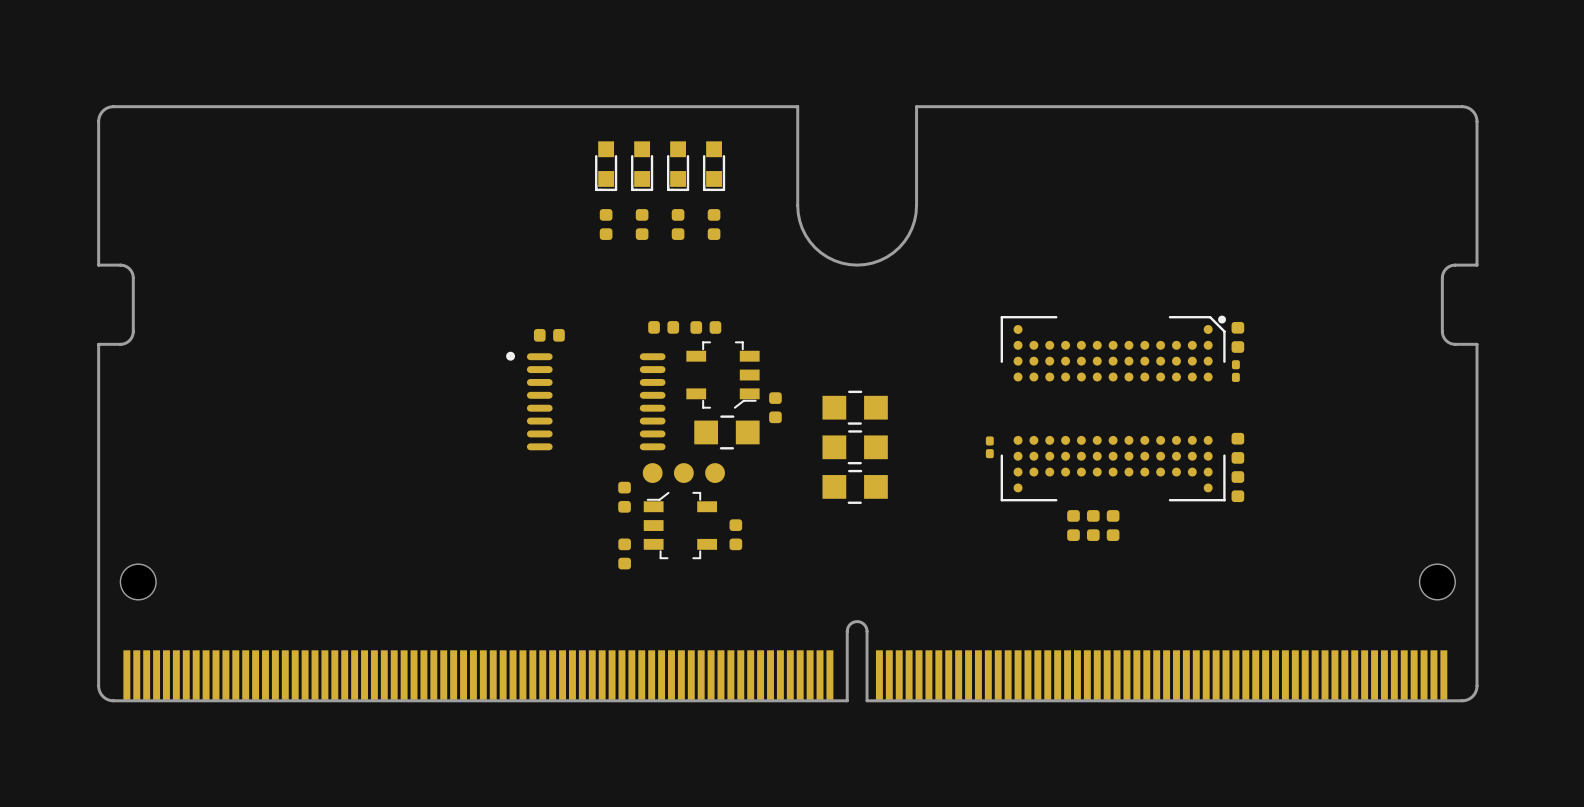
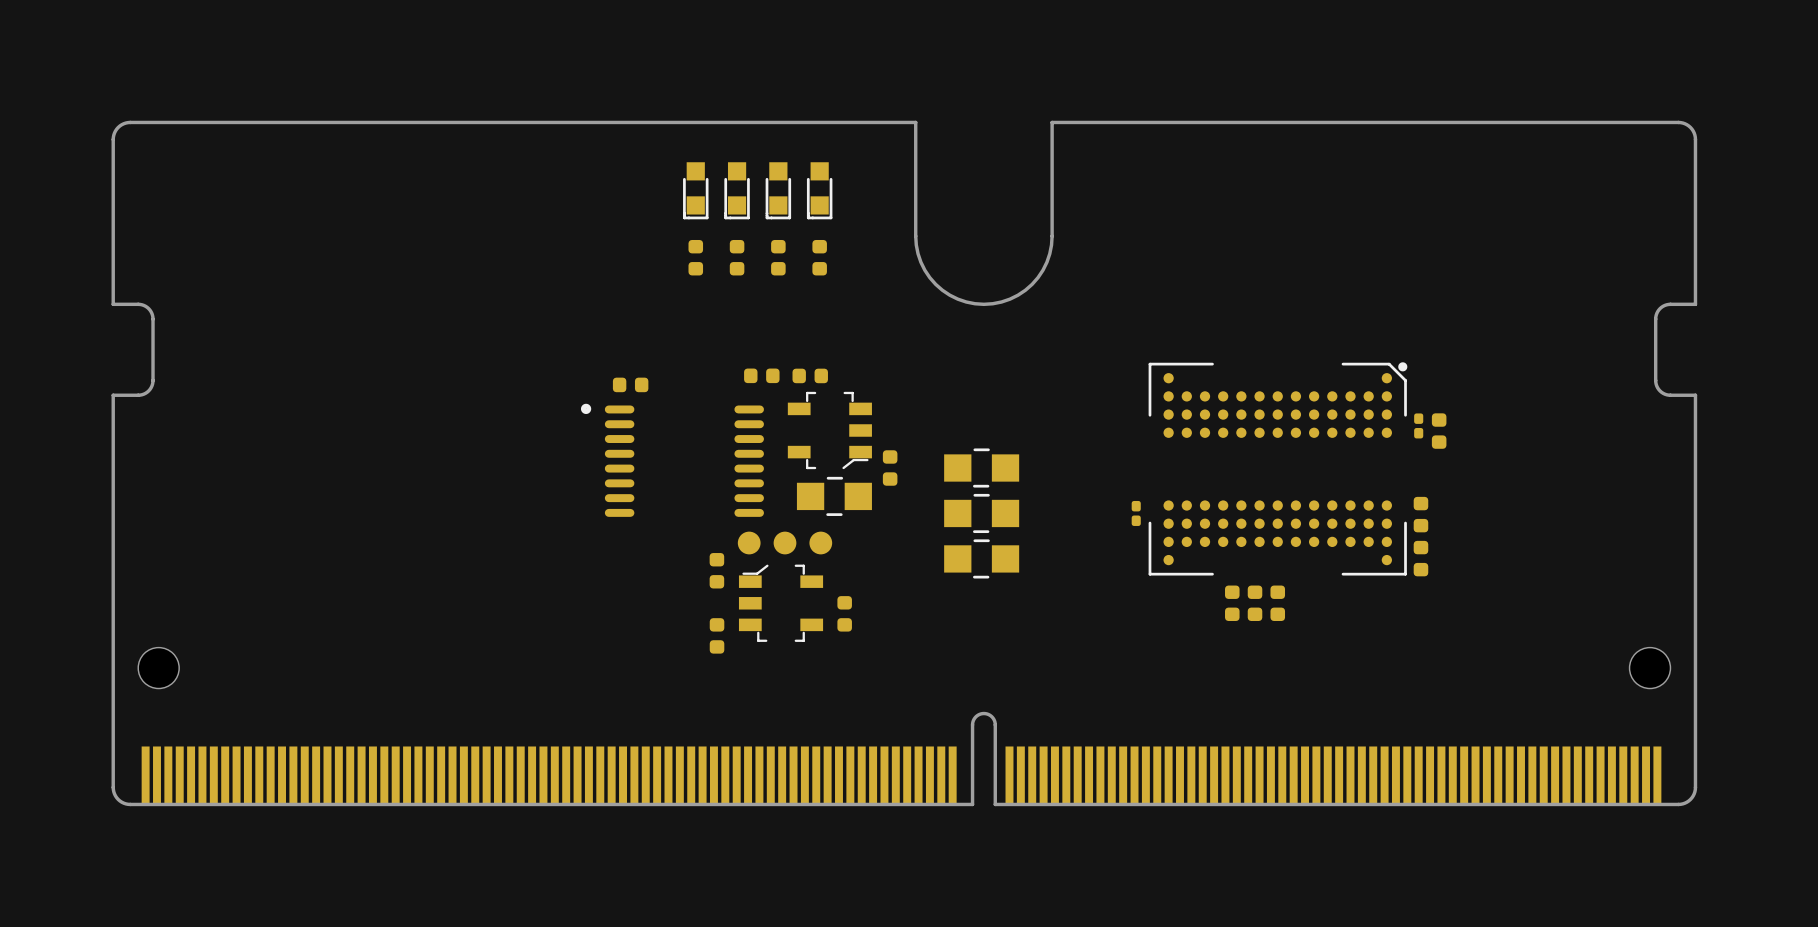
part position: (1237, 337) -> (1439, 431)

